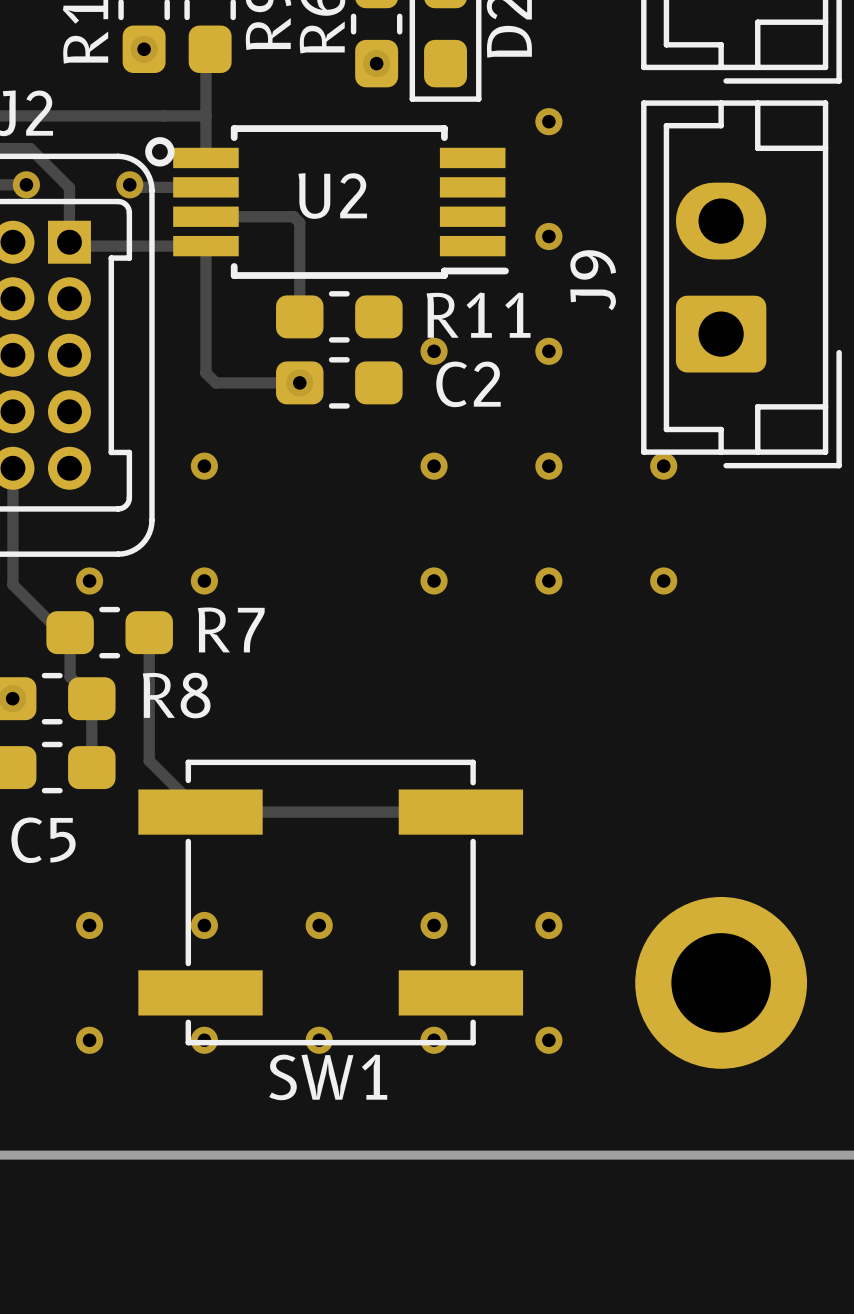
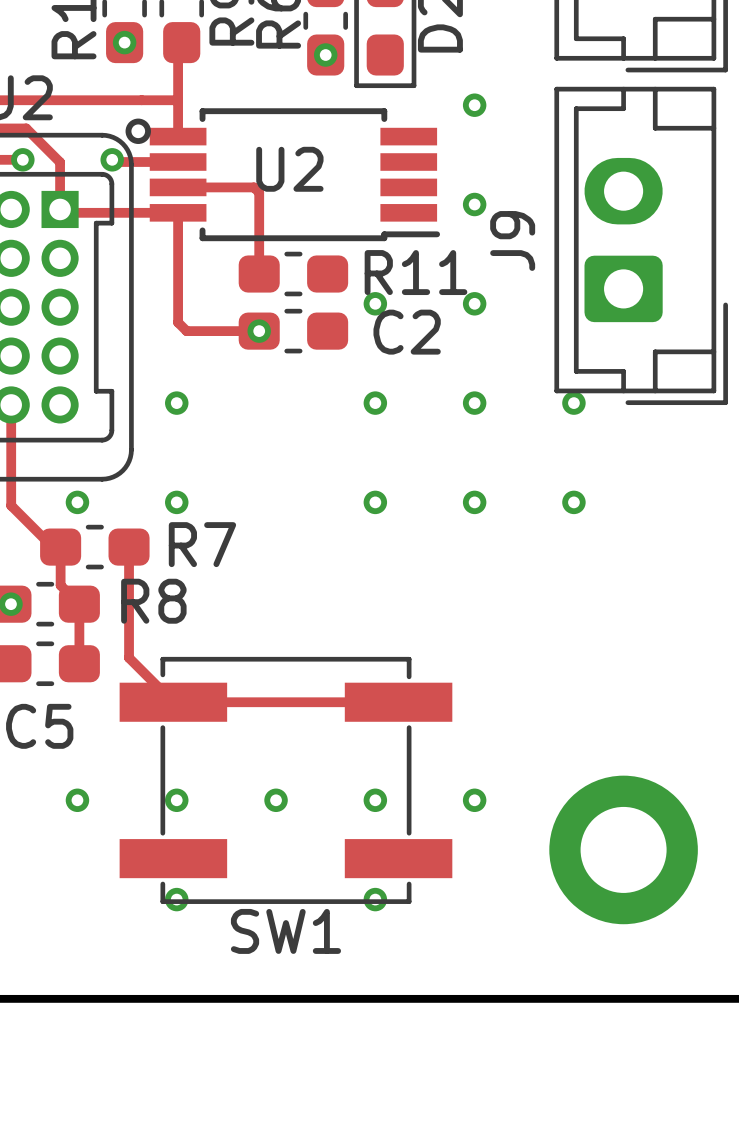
via: (89, 1040) -> none
via: (319, 1040) -> none
via: (548, 1040) -> none

